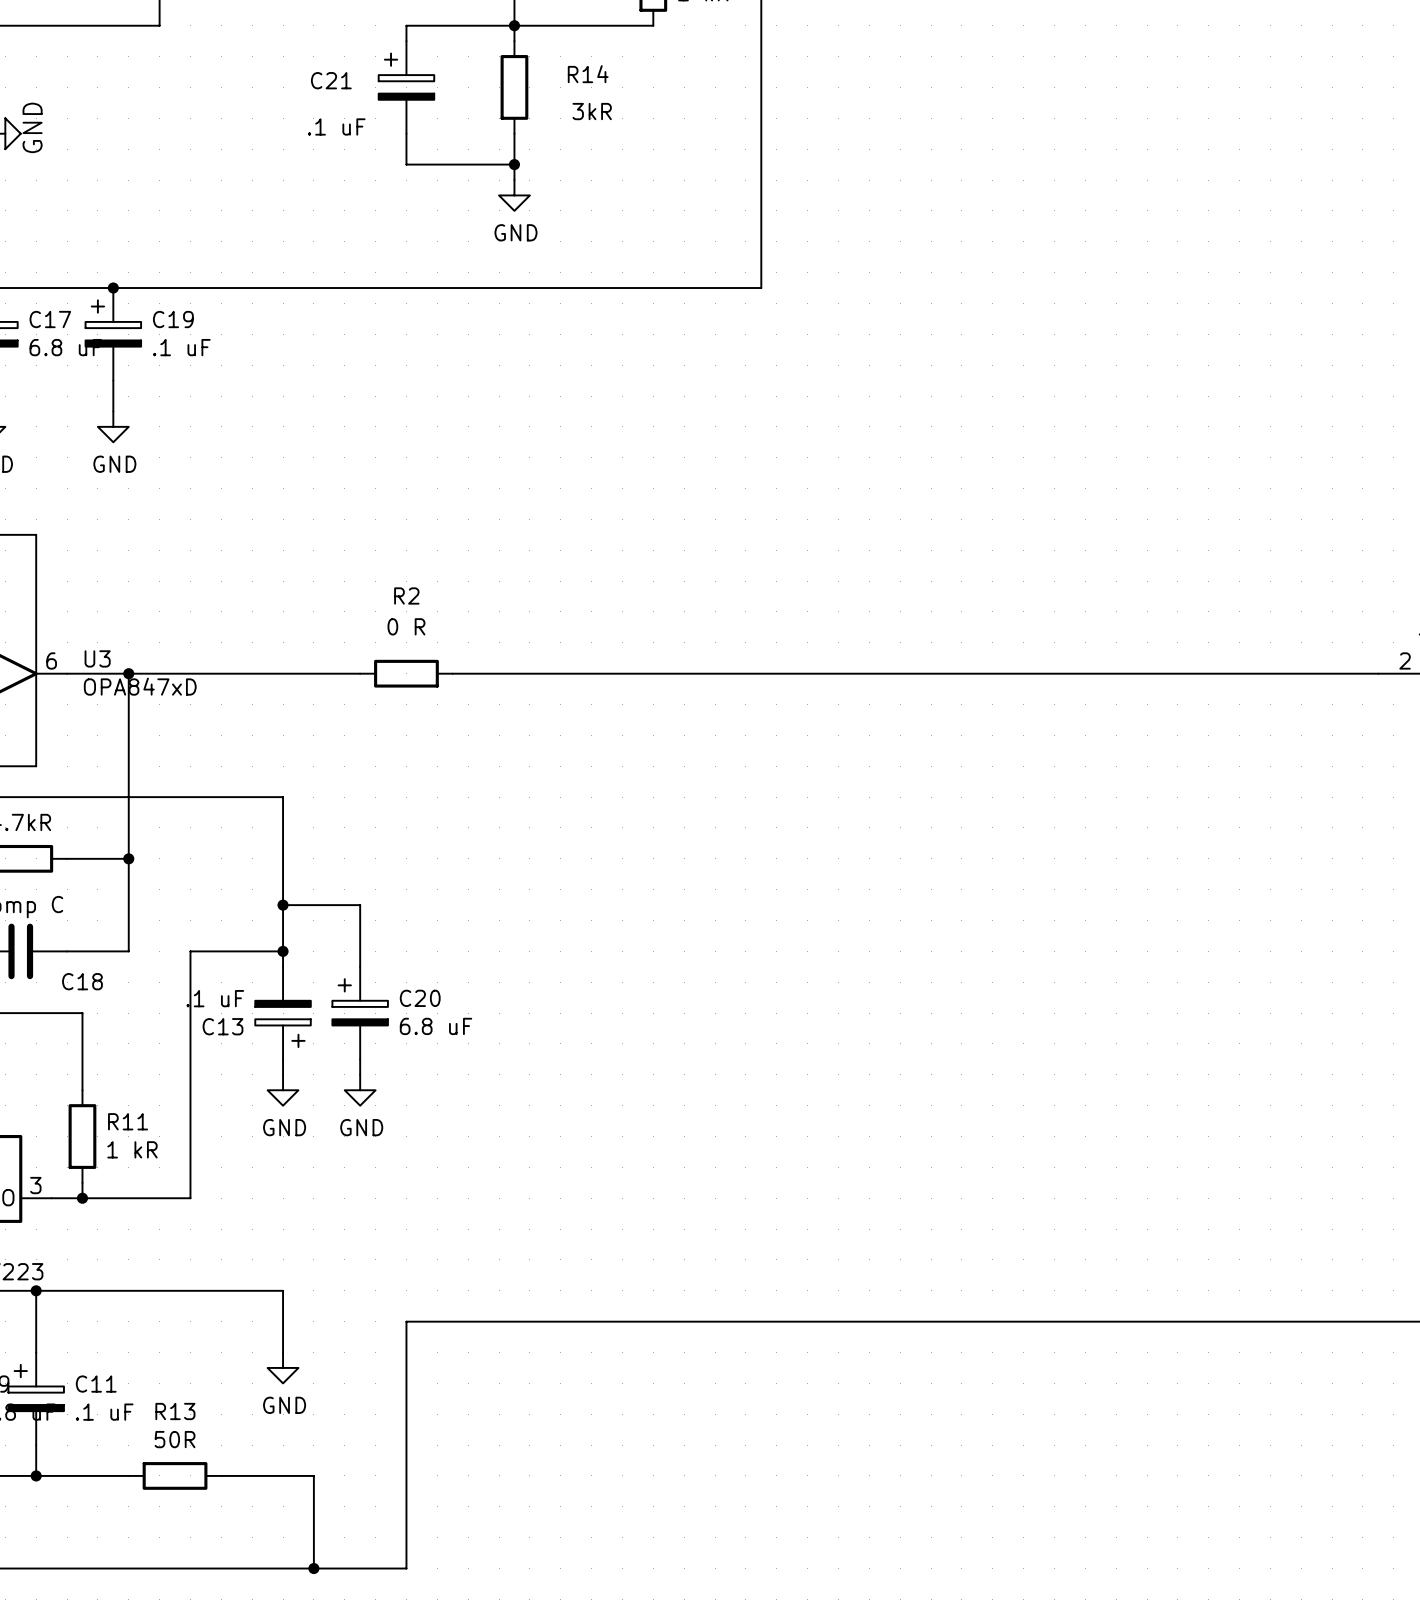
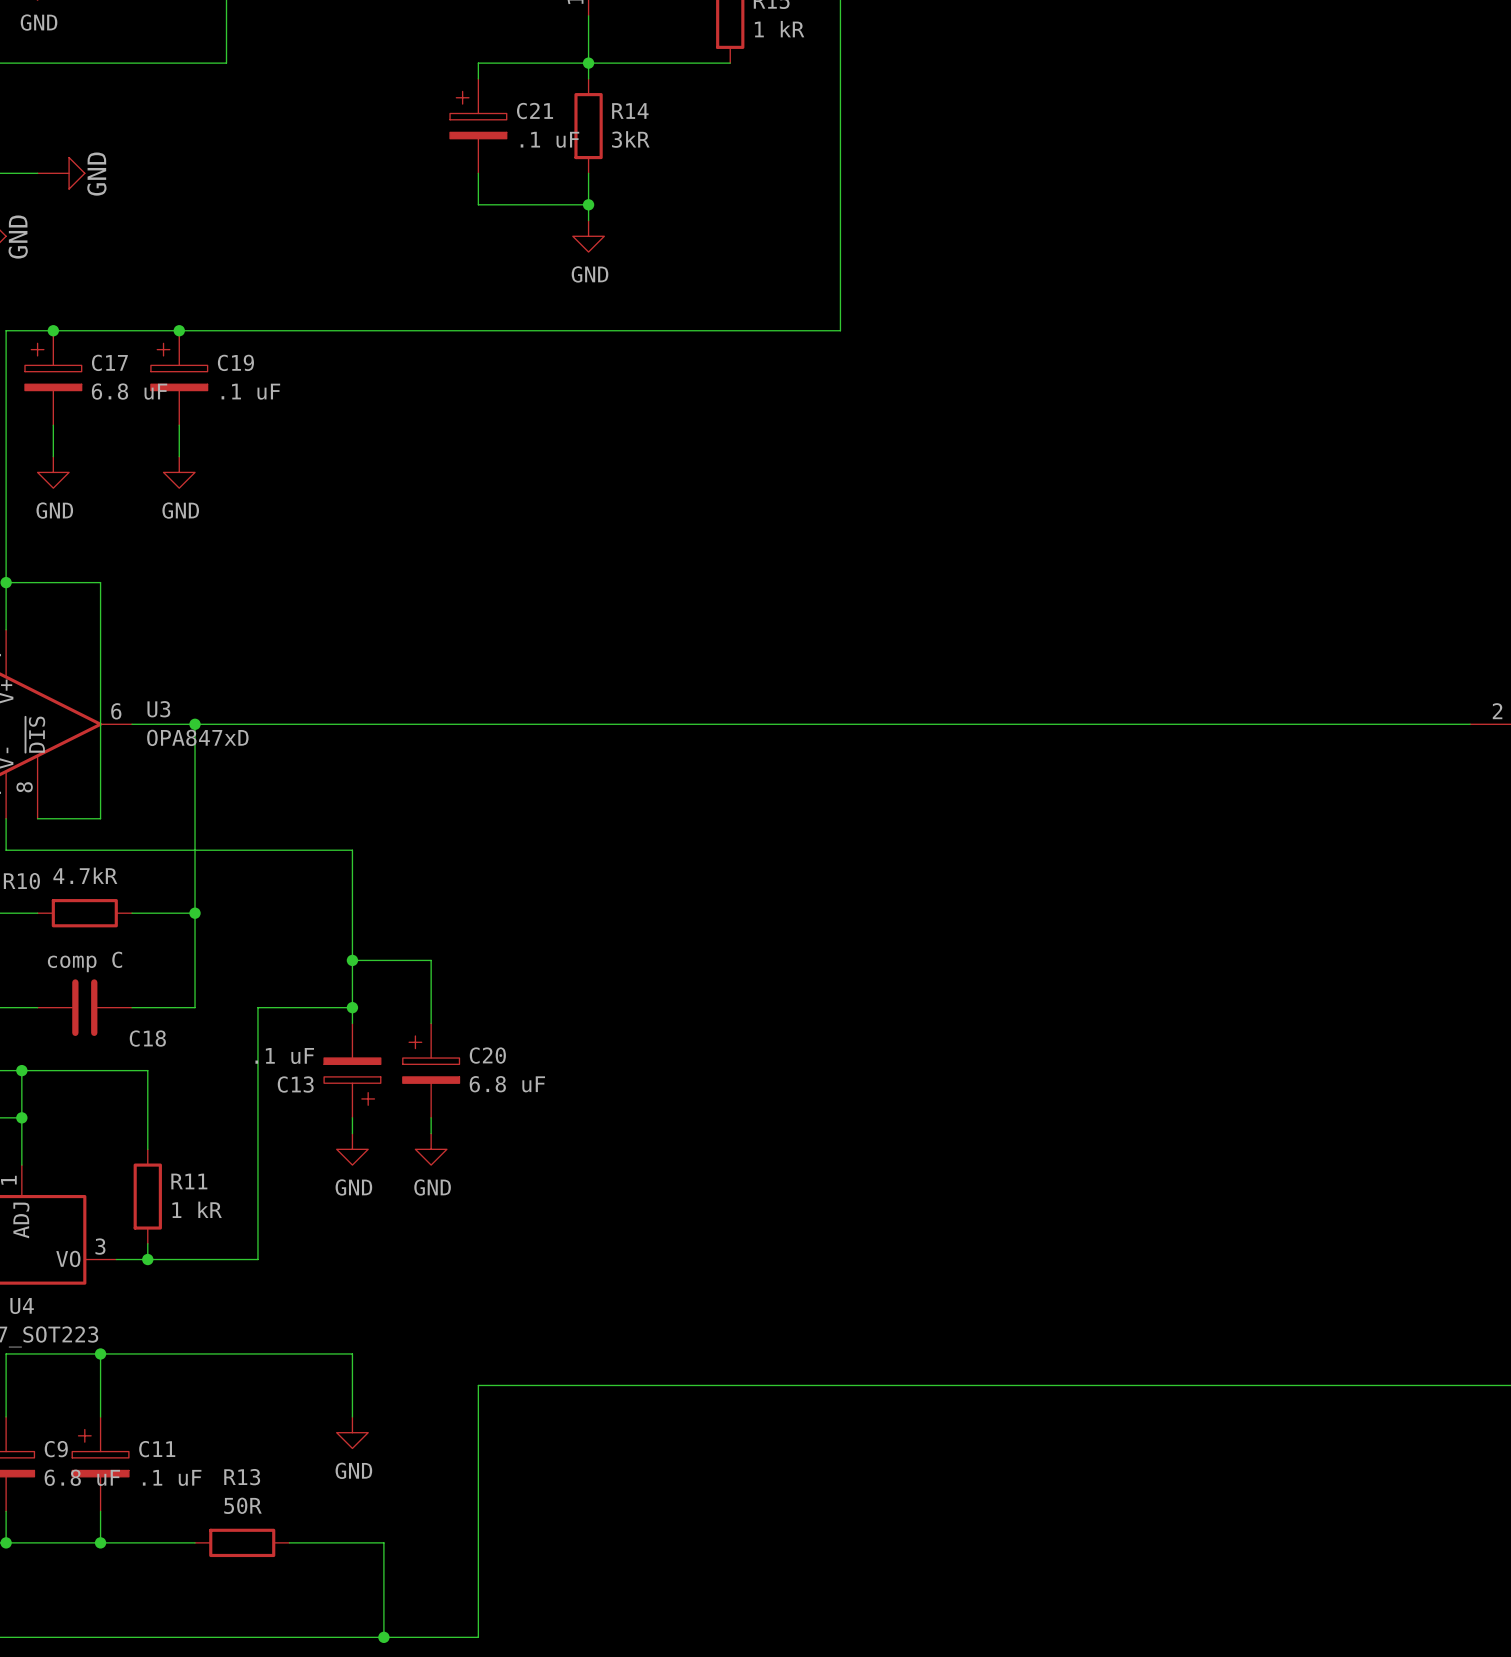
R14 name position: R14 (588, 74) -> R14 (630, 111)
C21 name position: C21 (331, 80) -> C21 (535, 111)
R14 value position: 3kR (592, 111) -> 3kR (630, 139)
C21 value position: .1 uF (336, 126) -> .1 uF (549, 139)
wire: none -> (431, 724) (525, 724)
R2: 0 R (406, 673) -> none

